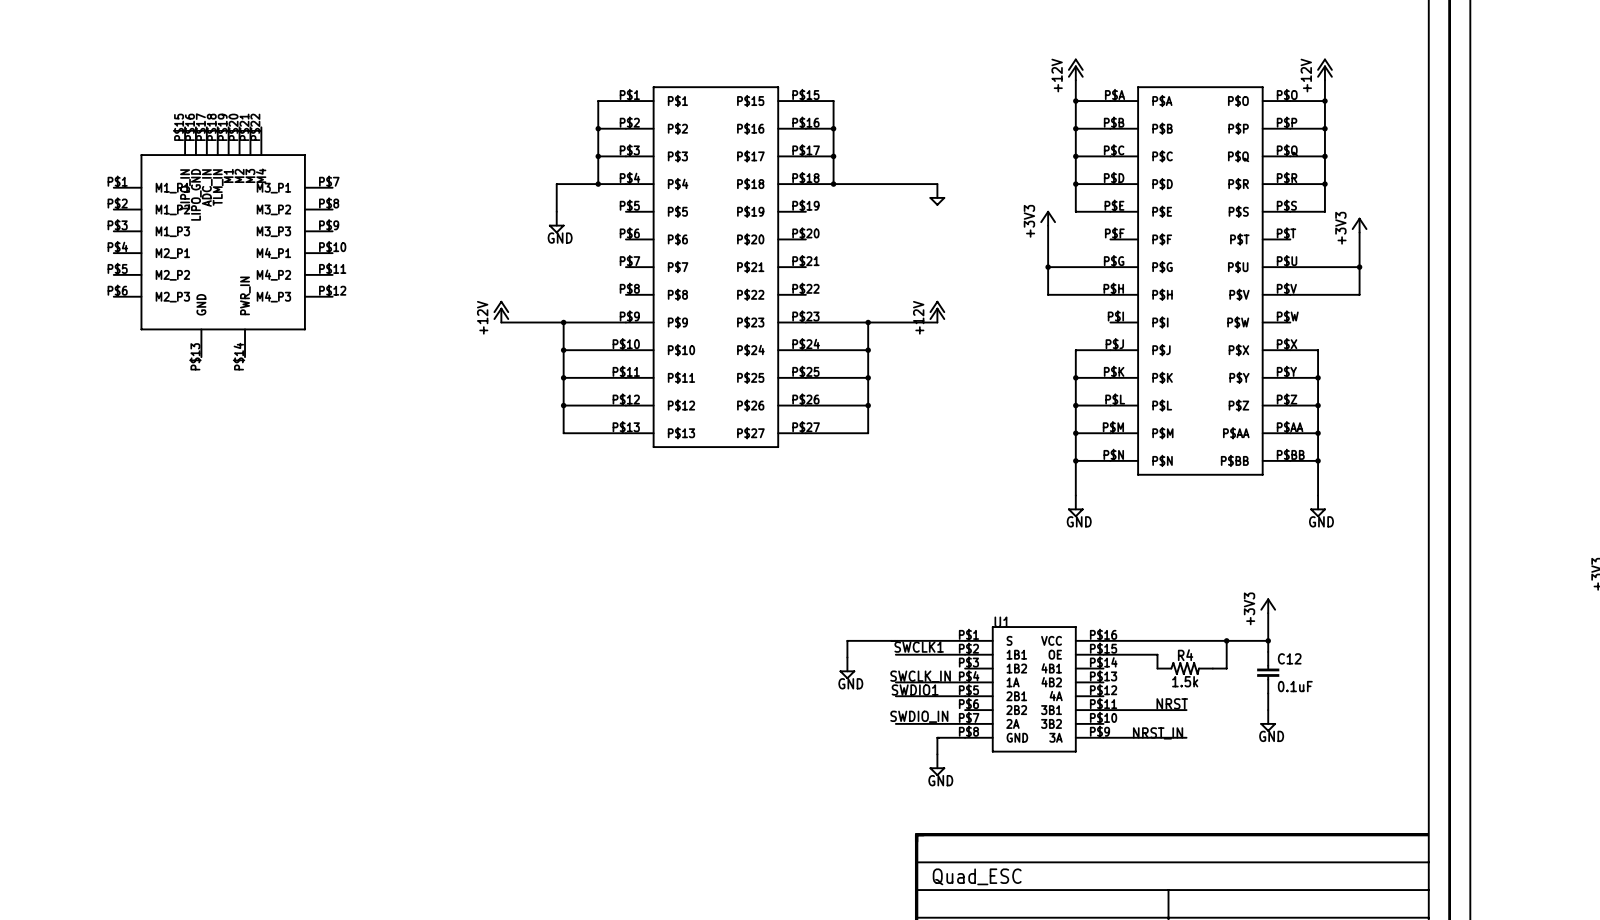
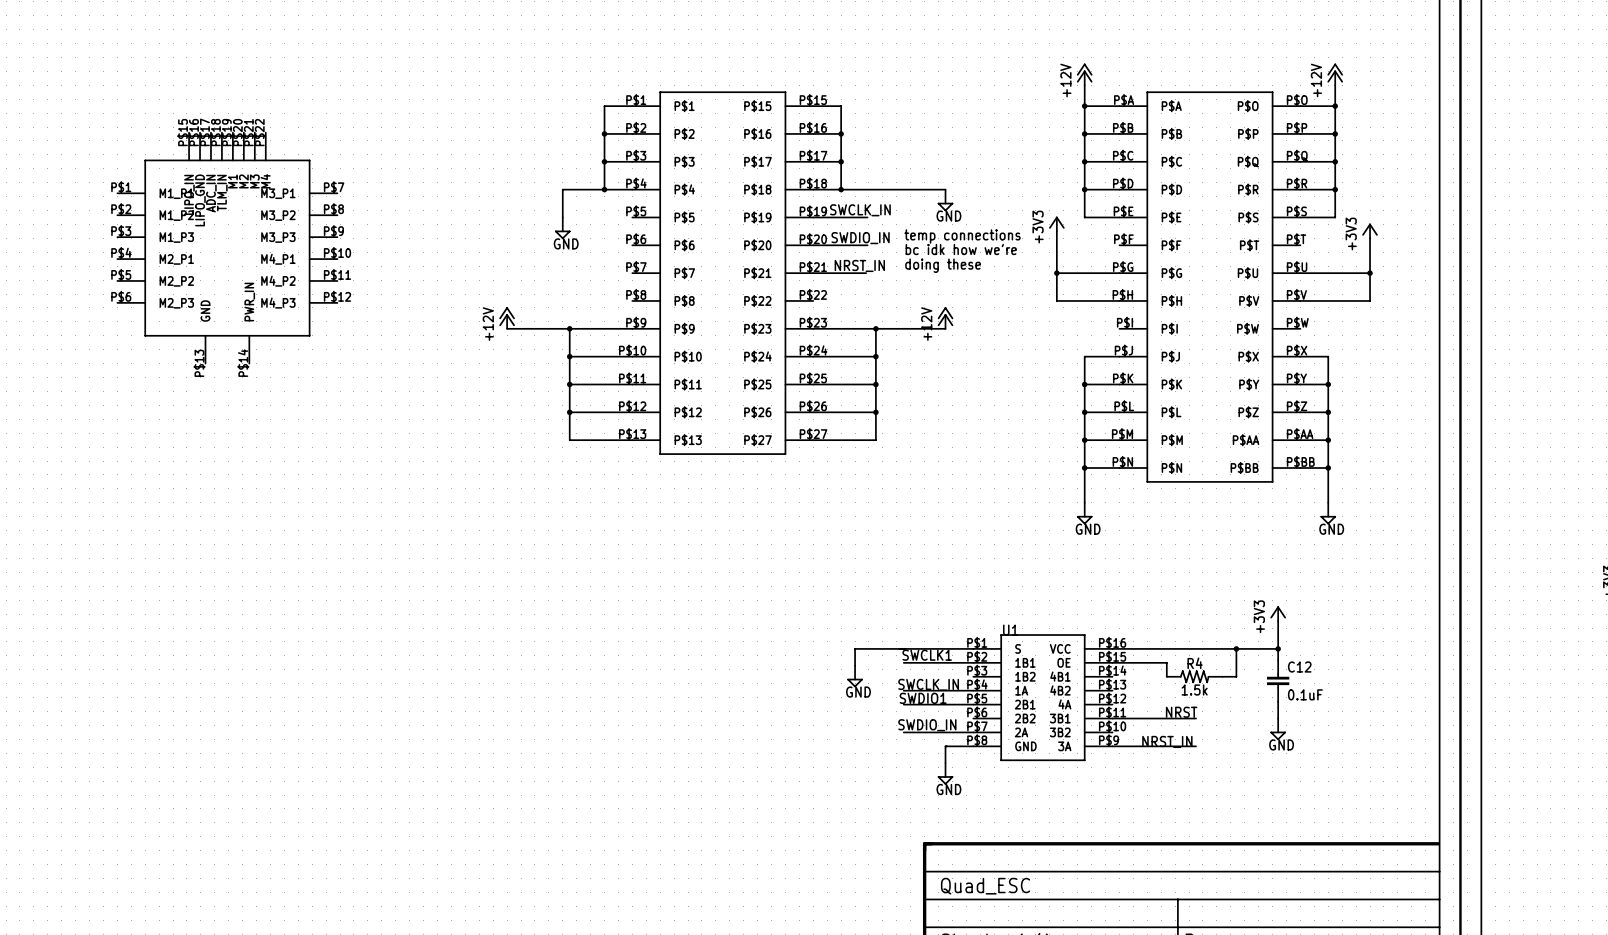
label: none -> SWCLK_IN (860, 210)
power symbol text: none -> GND (948, 216)
wire: none -> (813, 217) (867, 217)
text: none -> temp connections (962, 236)
label: none -> SWDIO_IN (860, 238)
wire: none -> (813, 245) (867, 245)
text: none -> bc idk how we're (961, 249)
label: none -> NRST_IN (859, 265)
text: none -> doing these (943, 265)
wire: none -> (813, 273) (866, 273)

